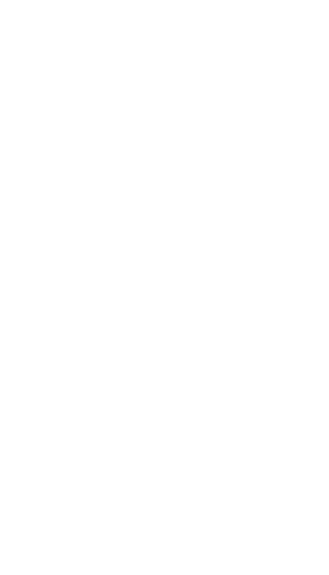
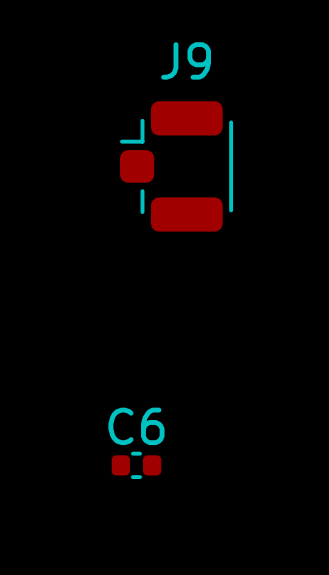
J9: none -> (176, 166)
C6: none -> (136, 465)

